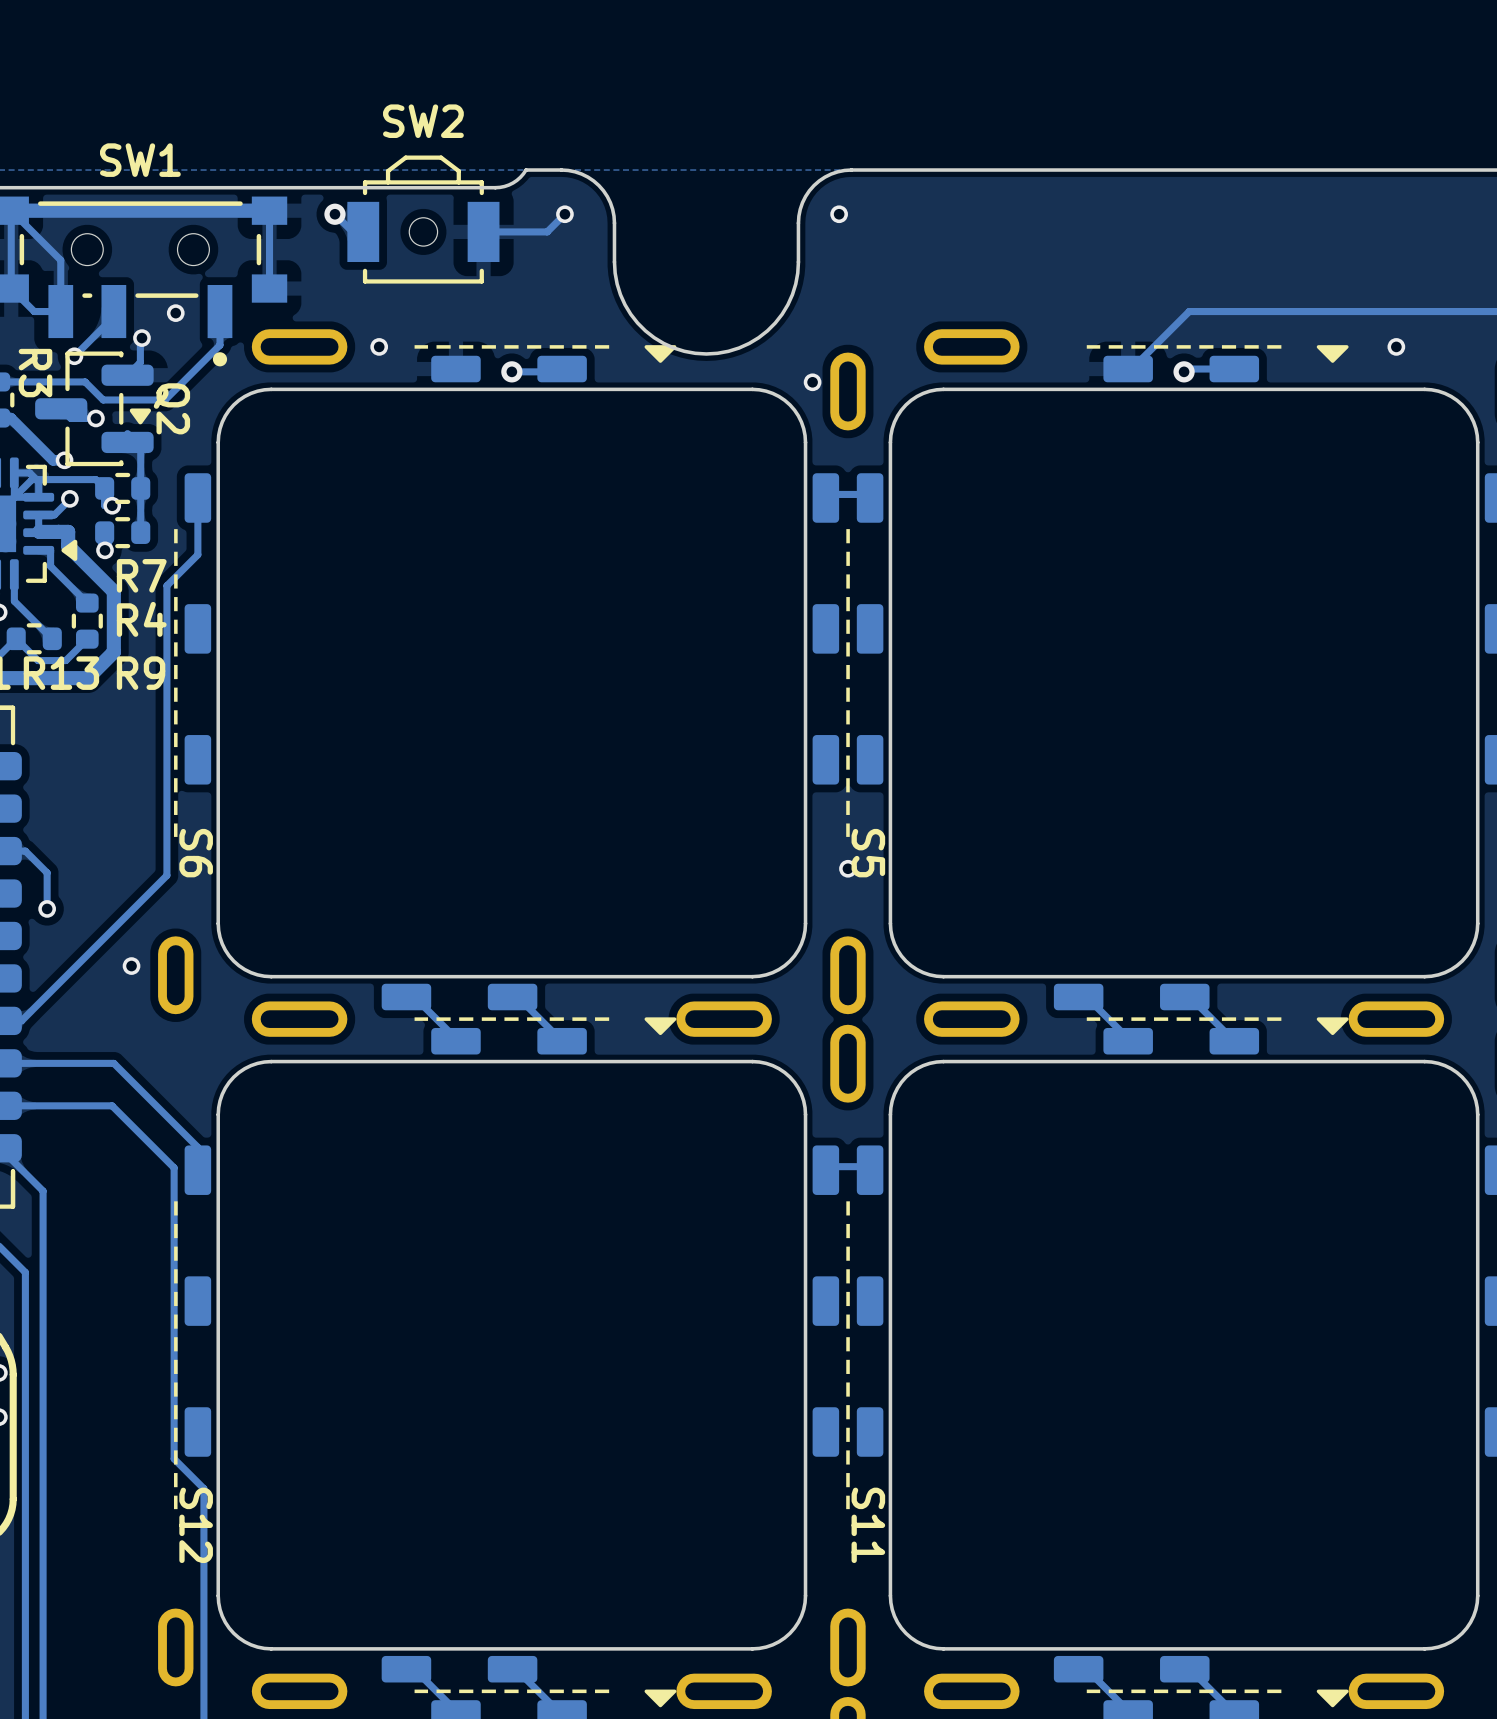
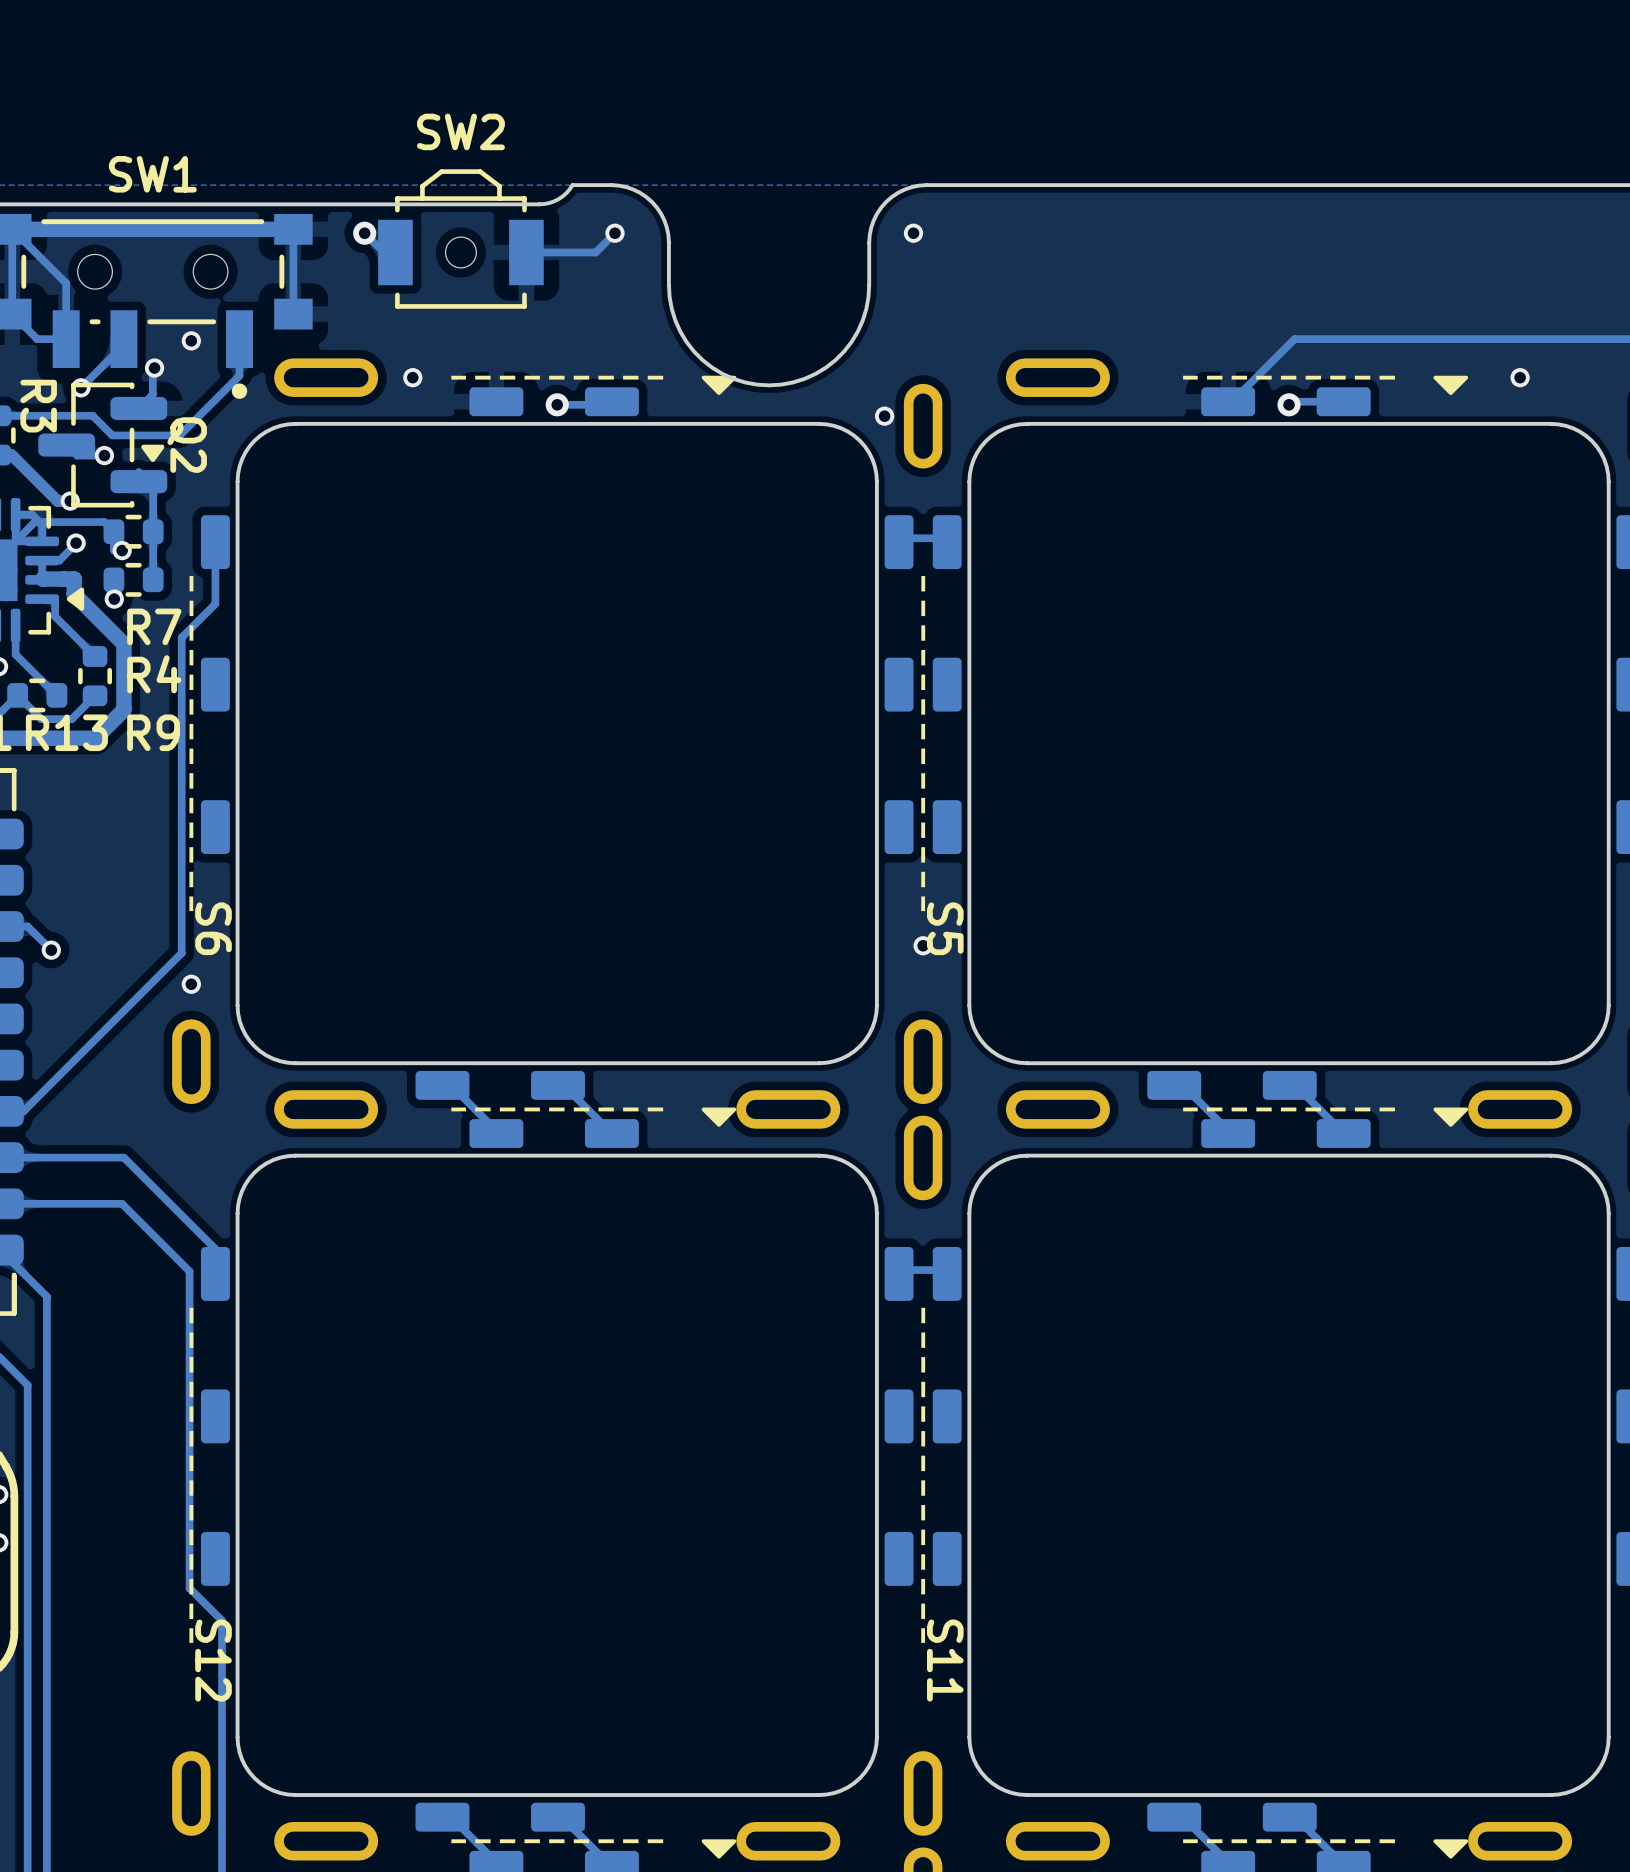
track: (47, 872) (47, 908) -> none
via: none -> (191, 984)
via position: (47, 908) -> (51, 950)
via: (131, 966) -> none

